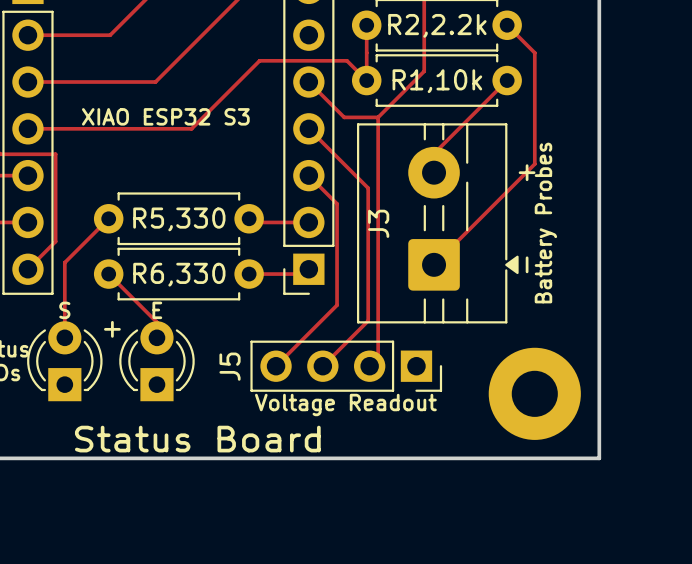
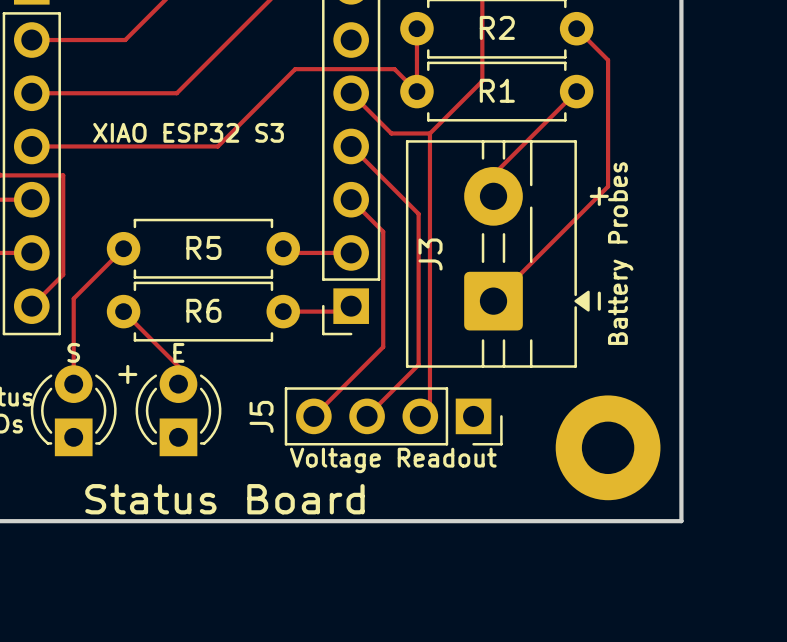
R2,2.2k name: R2,2.2k (437, 25) -> R2 (497, 27)
R1,10k name: R1,10k (437, 81) -> R1 (497, 90)
R5,330 name: R5,330 (179, 219) -> R5 (203, 247)
R6,330 name: R6,330 (179, 274) -> R6 (203, 310)

